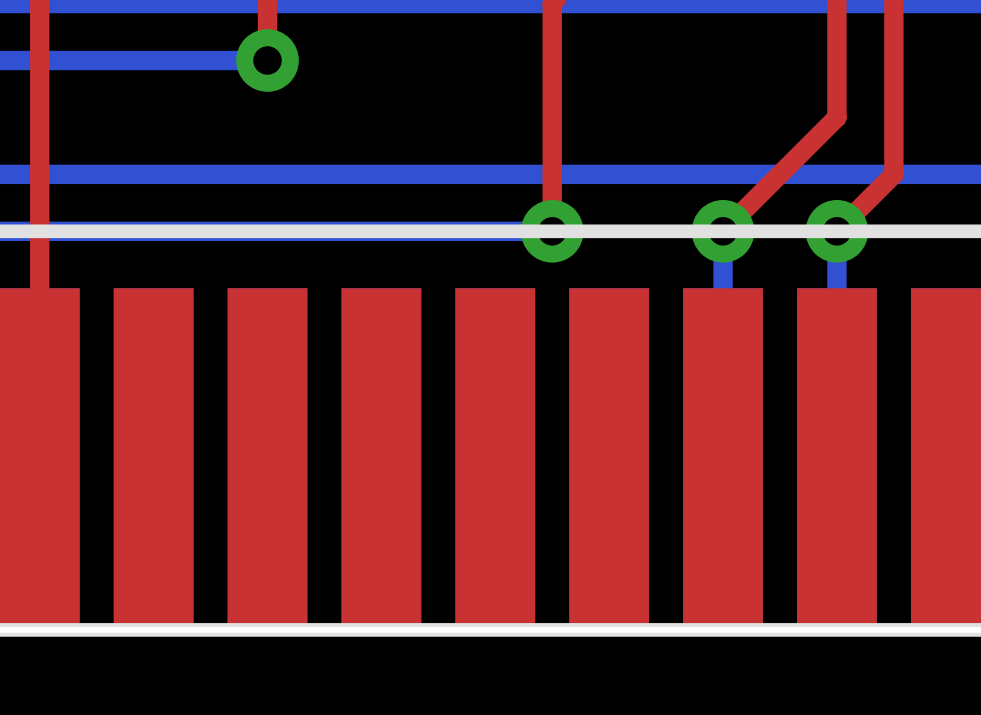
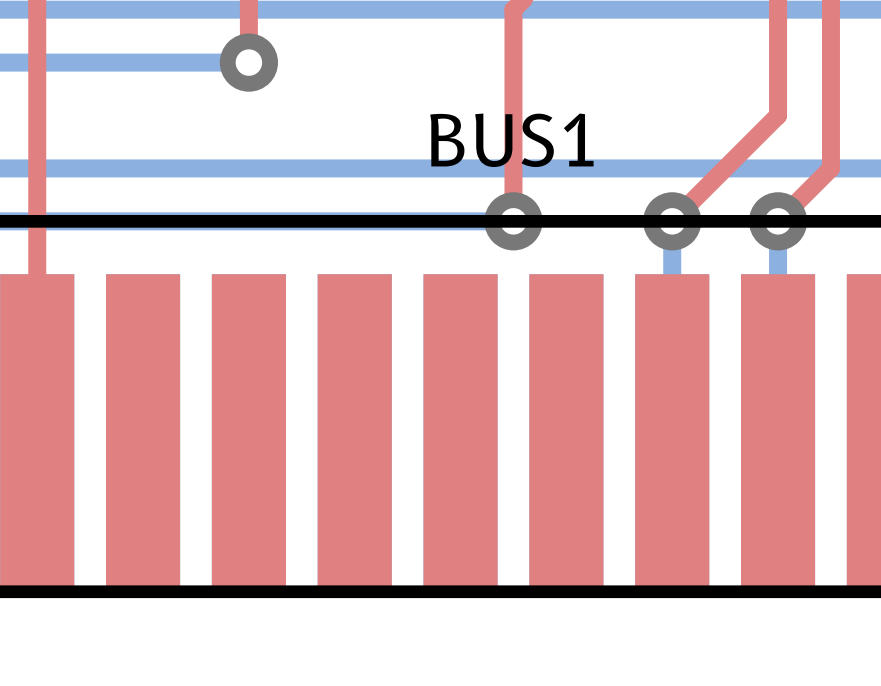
BUS1 name: none -> BUS1 (511, 140)

